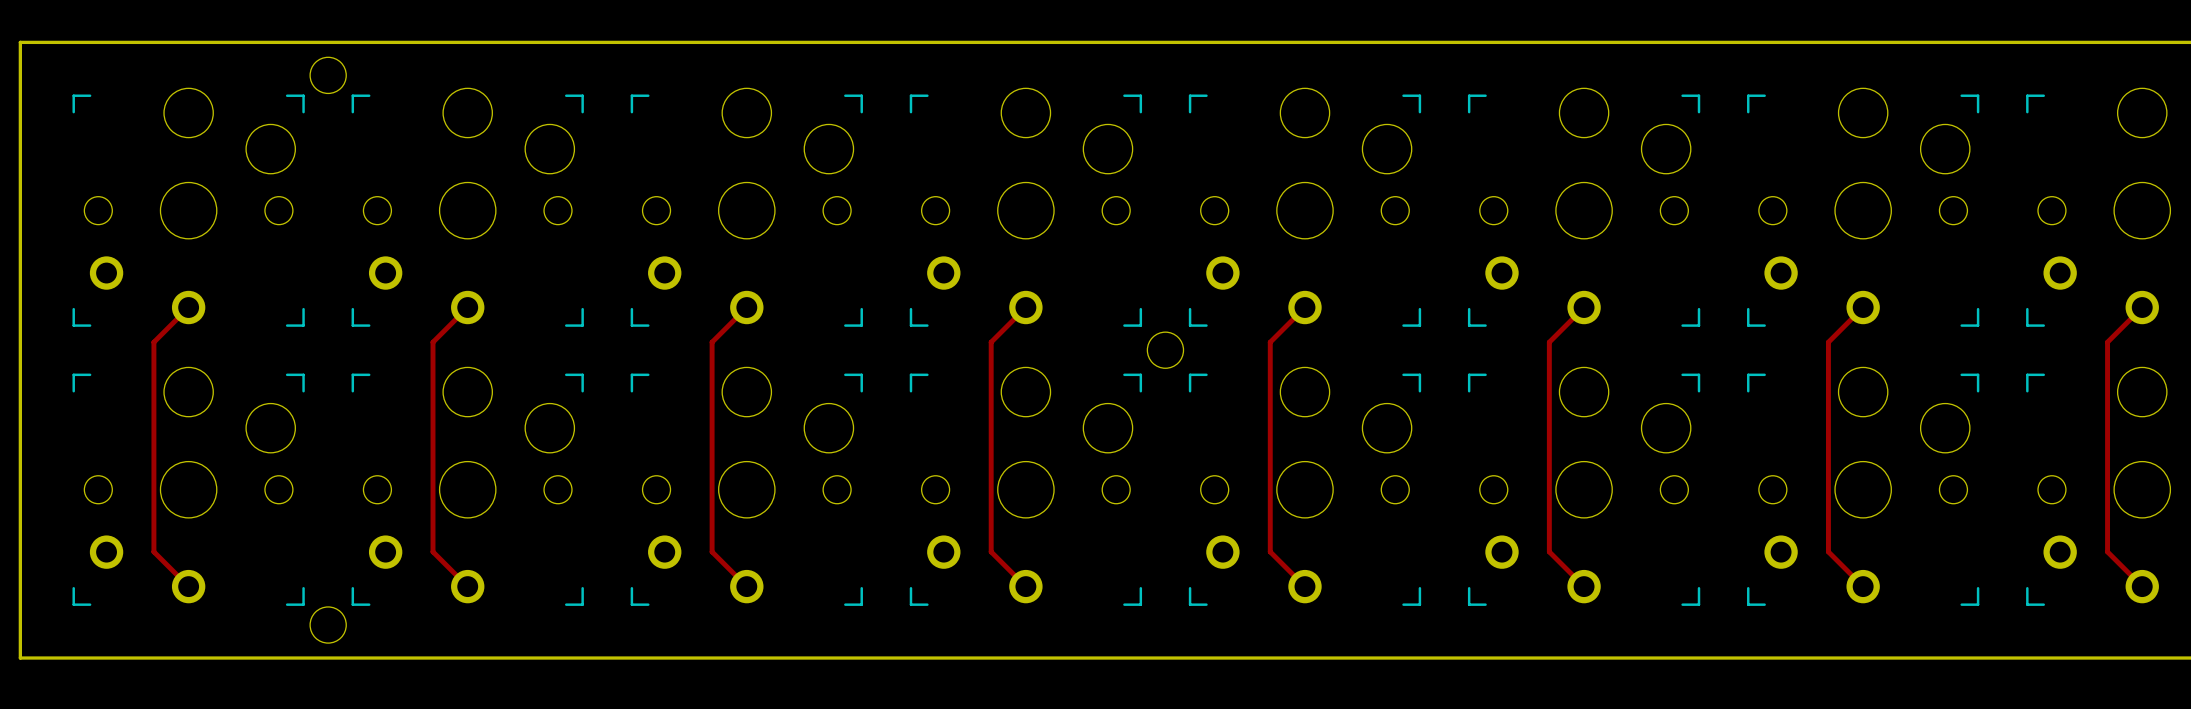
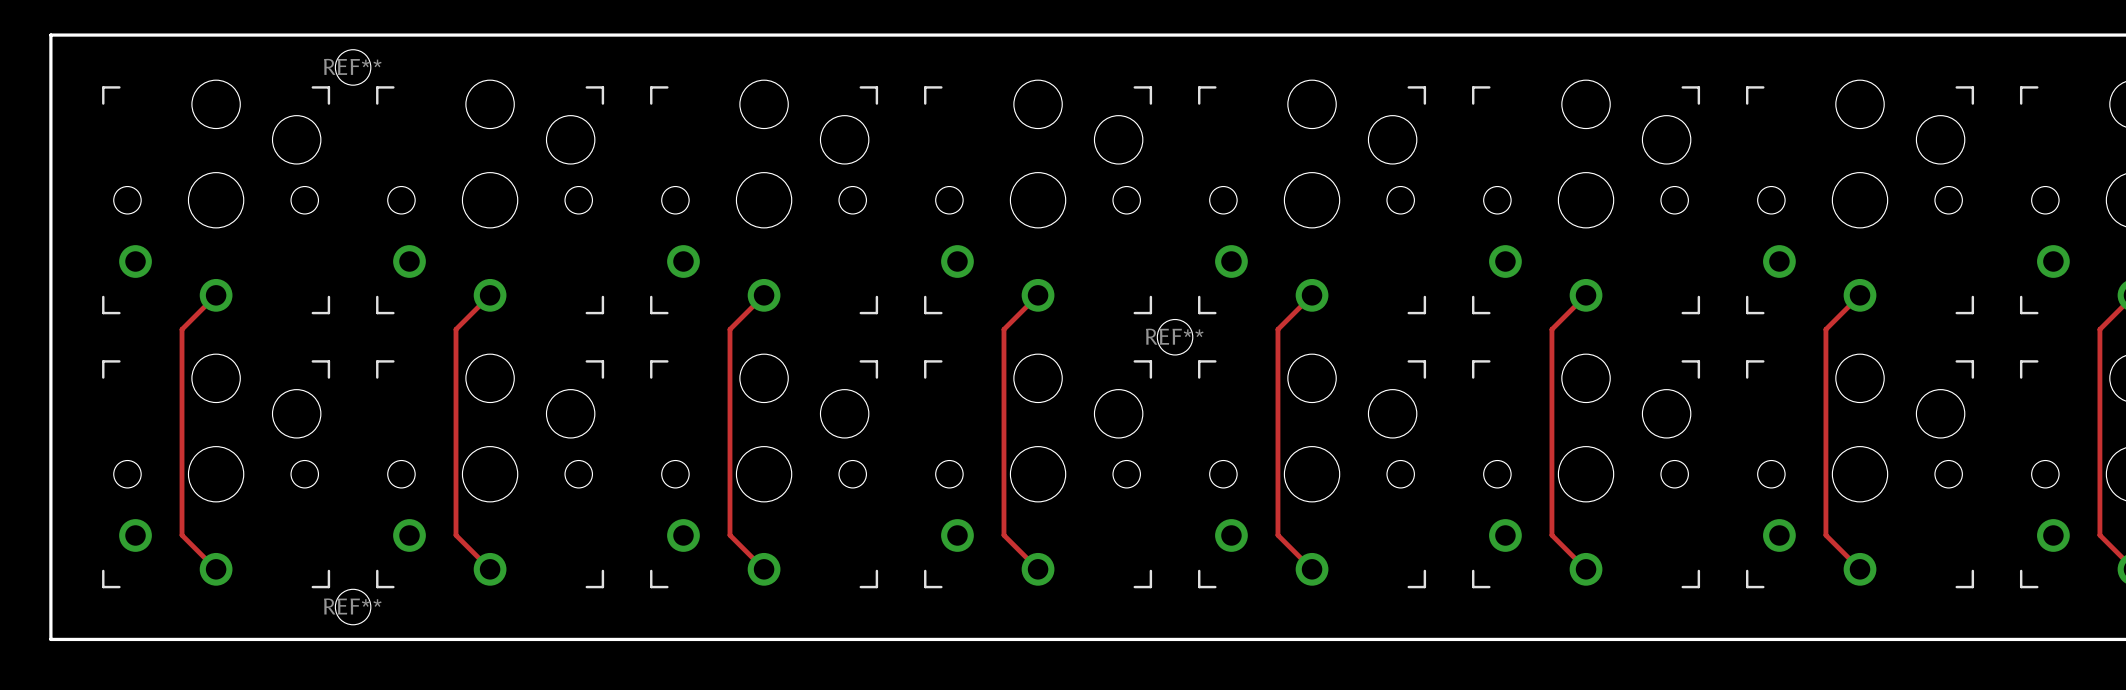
REF** name: none -> REF** (352, 66)
REF** name: none -> REF** (1174, 336)
REF** name: none -> REF** (352, 606)

